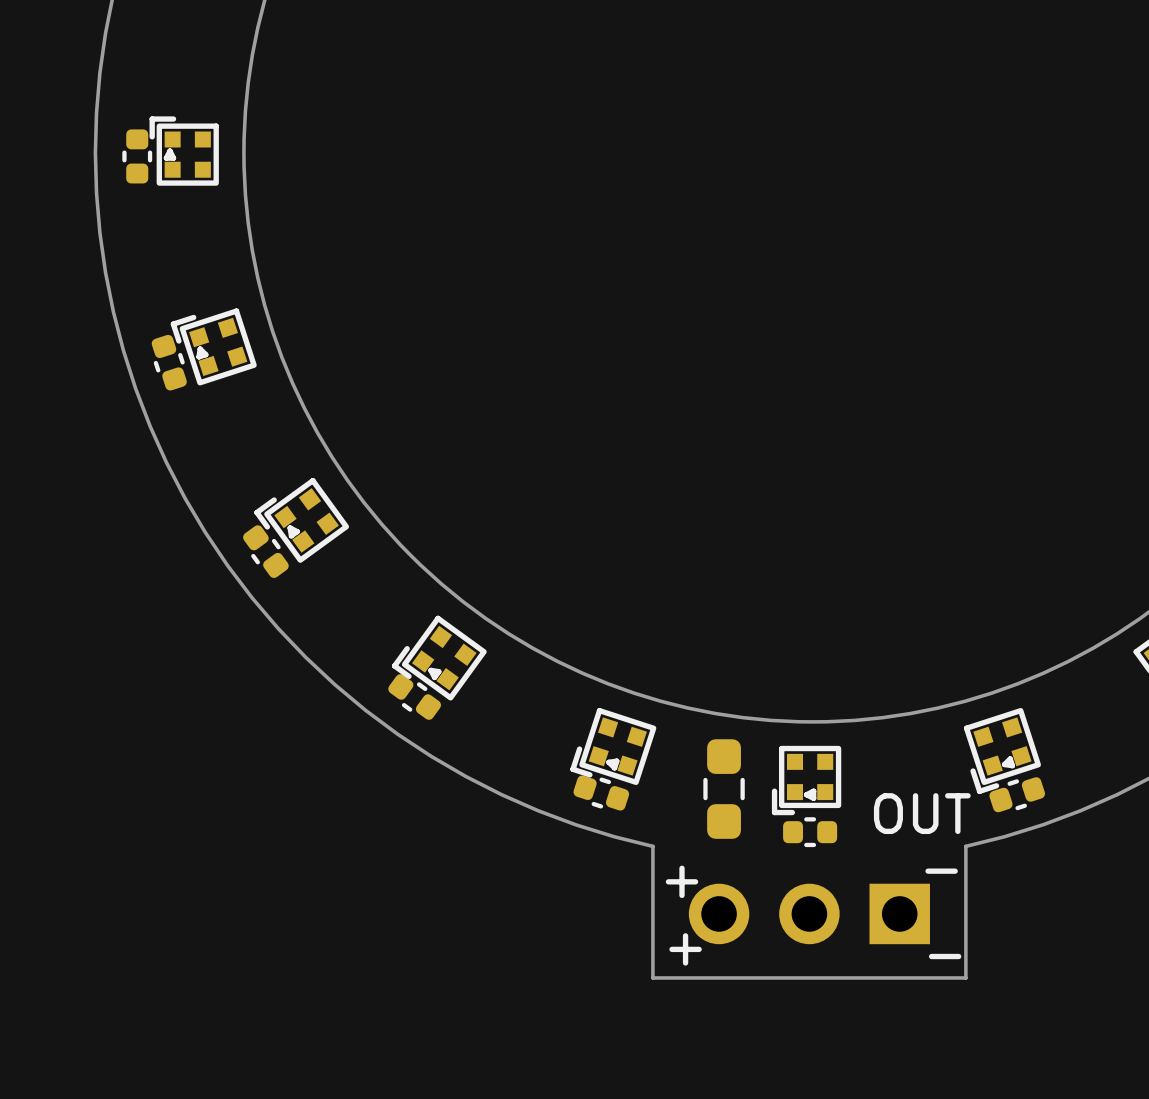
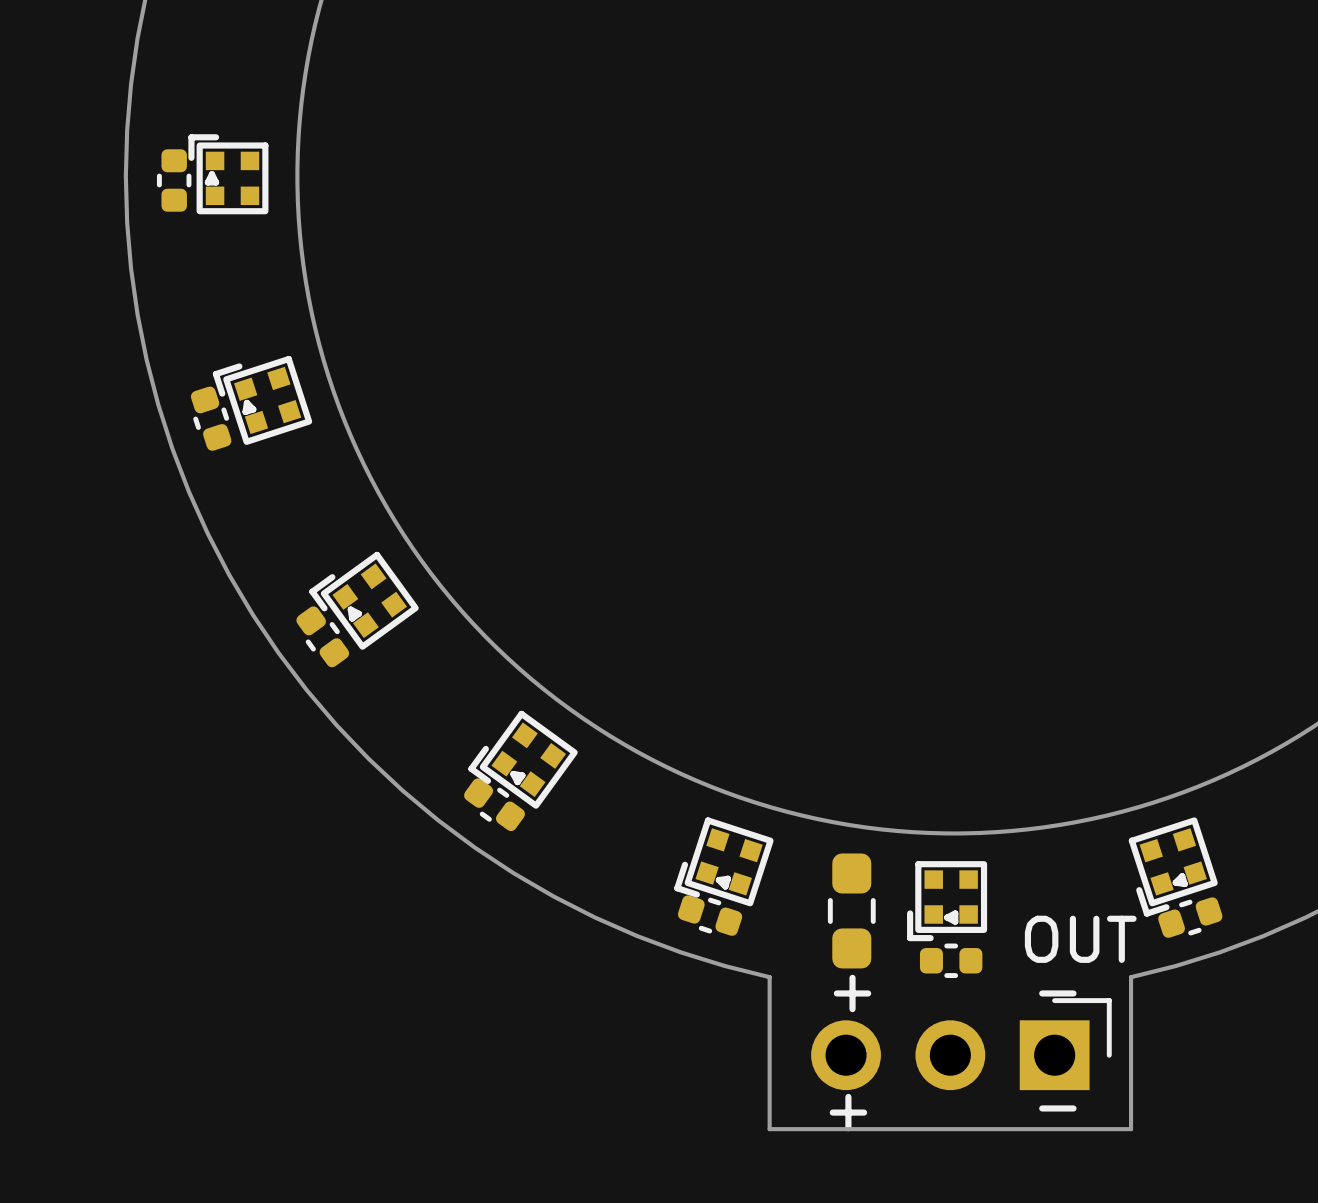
text position: - (941, 871) -> - (1057, 993)
text position: + (682, 881) -> + (852, 993)
part footprint: [688, 883, 930, 945] -> [811, 998, 1112, 1091]
text position: + (685, 949) -> + (848, 1112)
text position: - (945, 956) -> - (1057, 1108)

